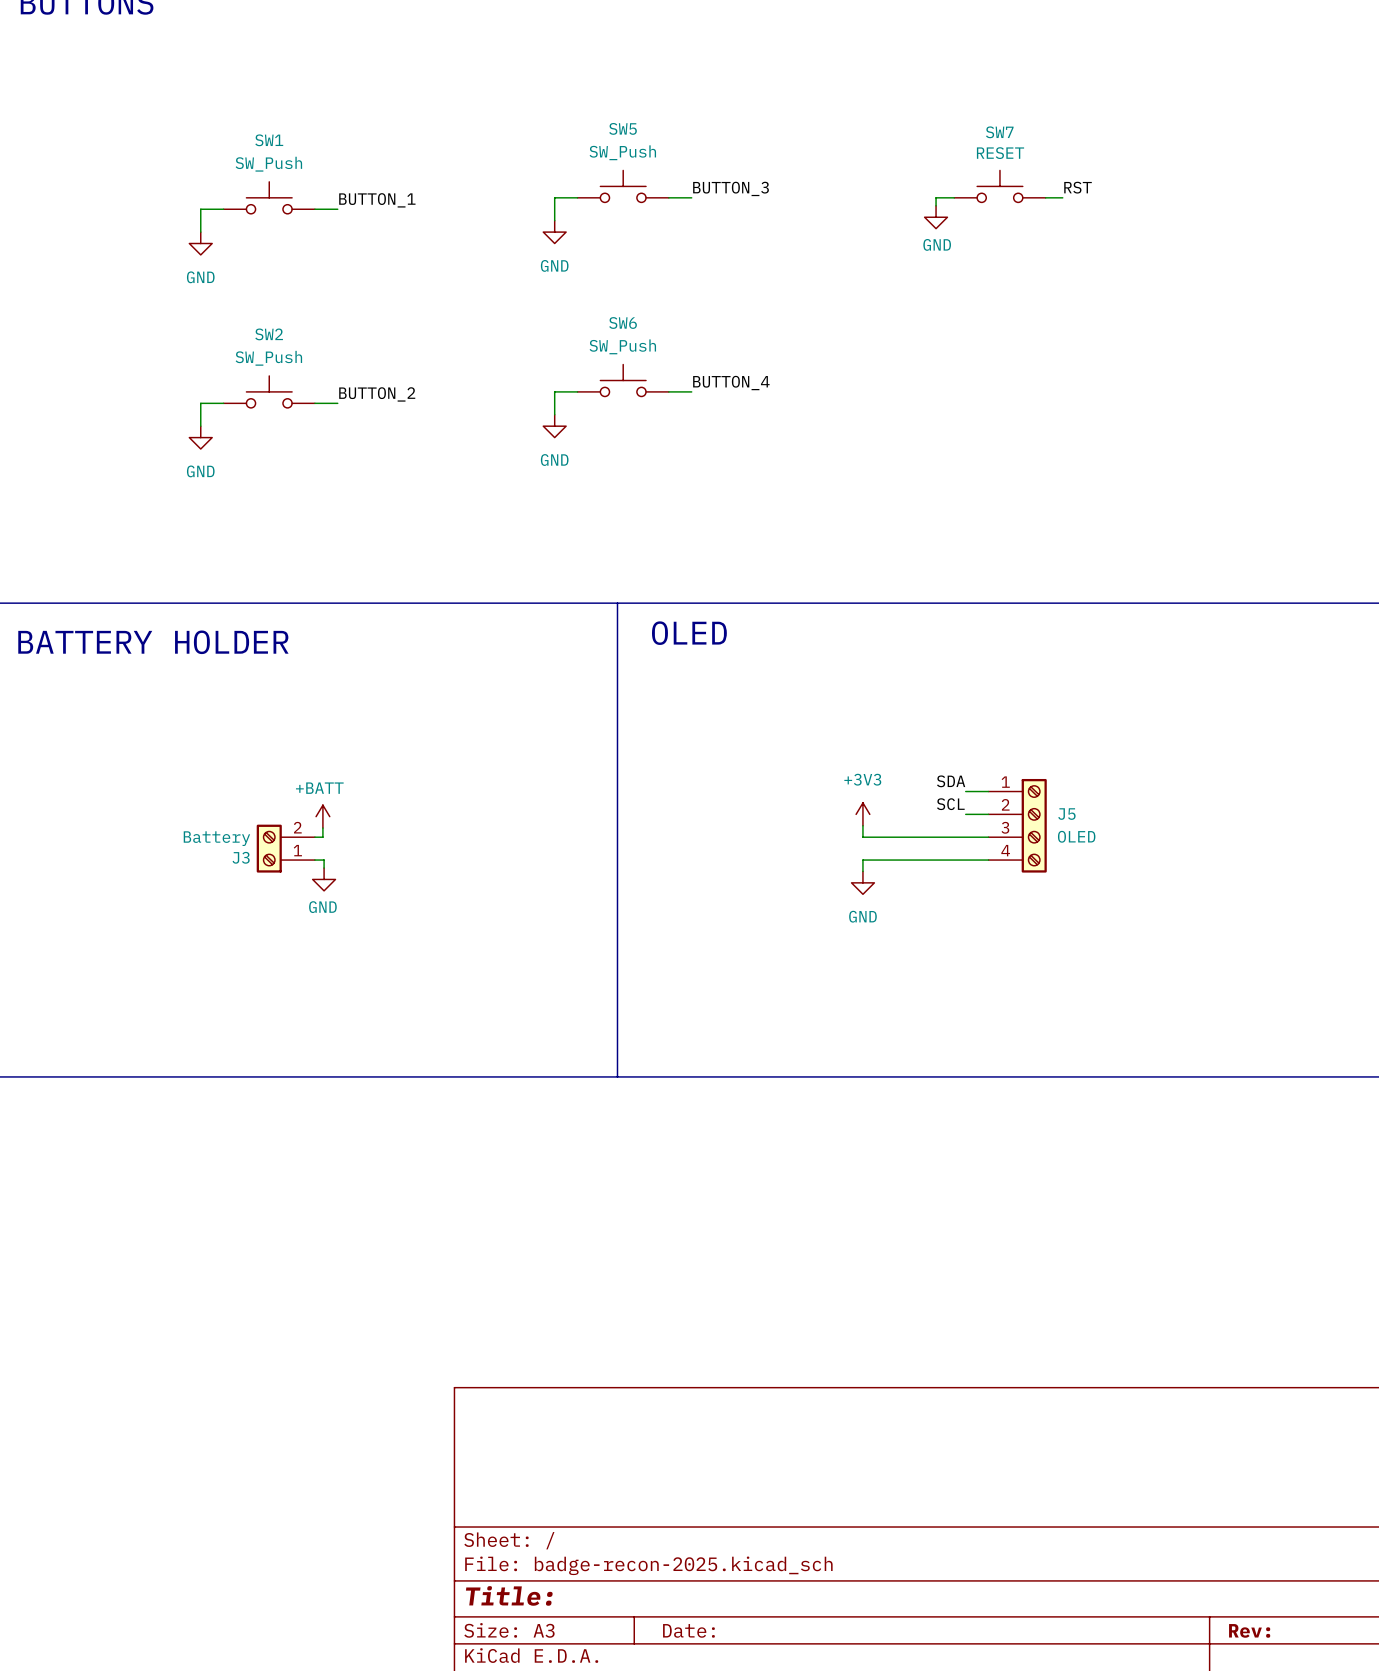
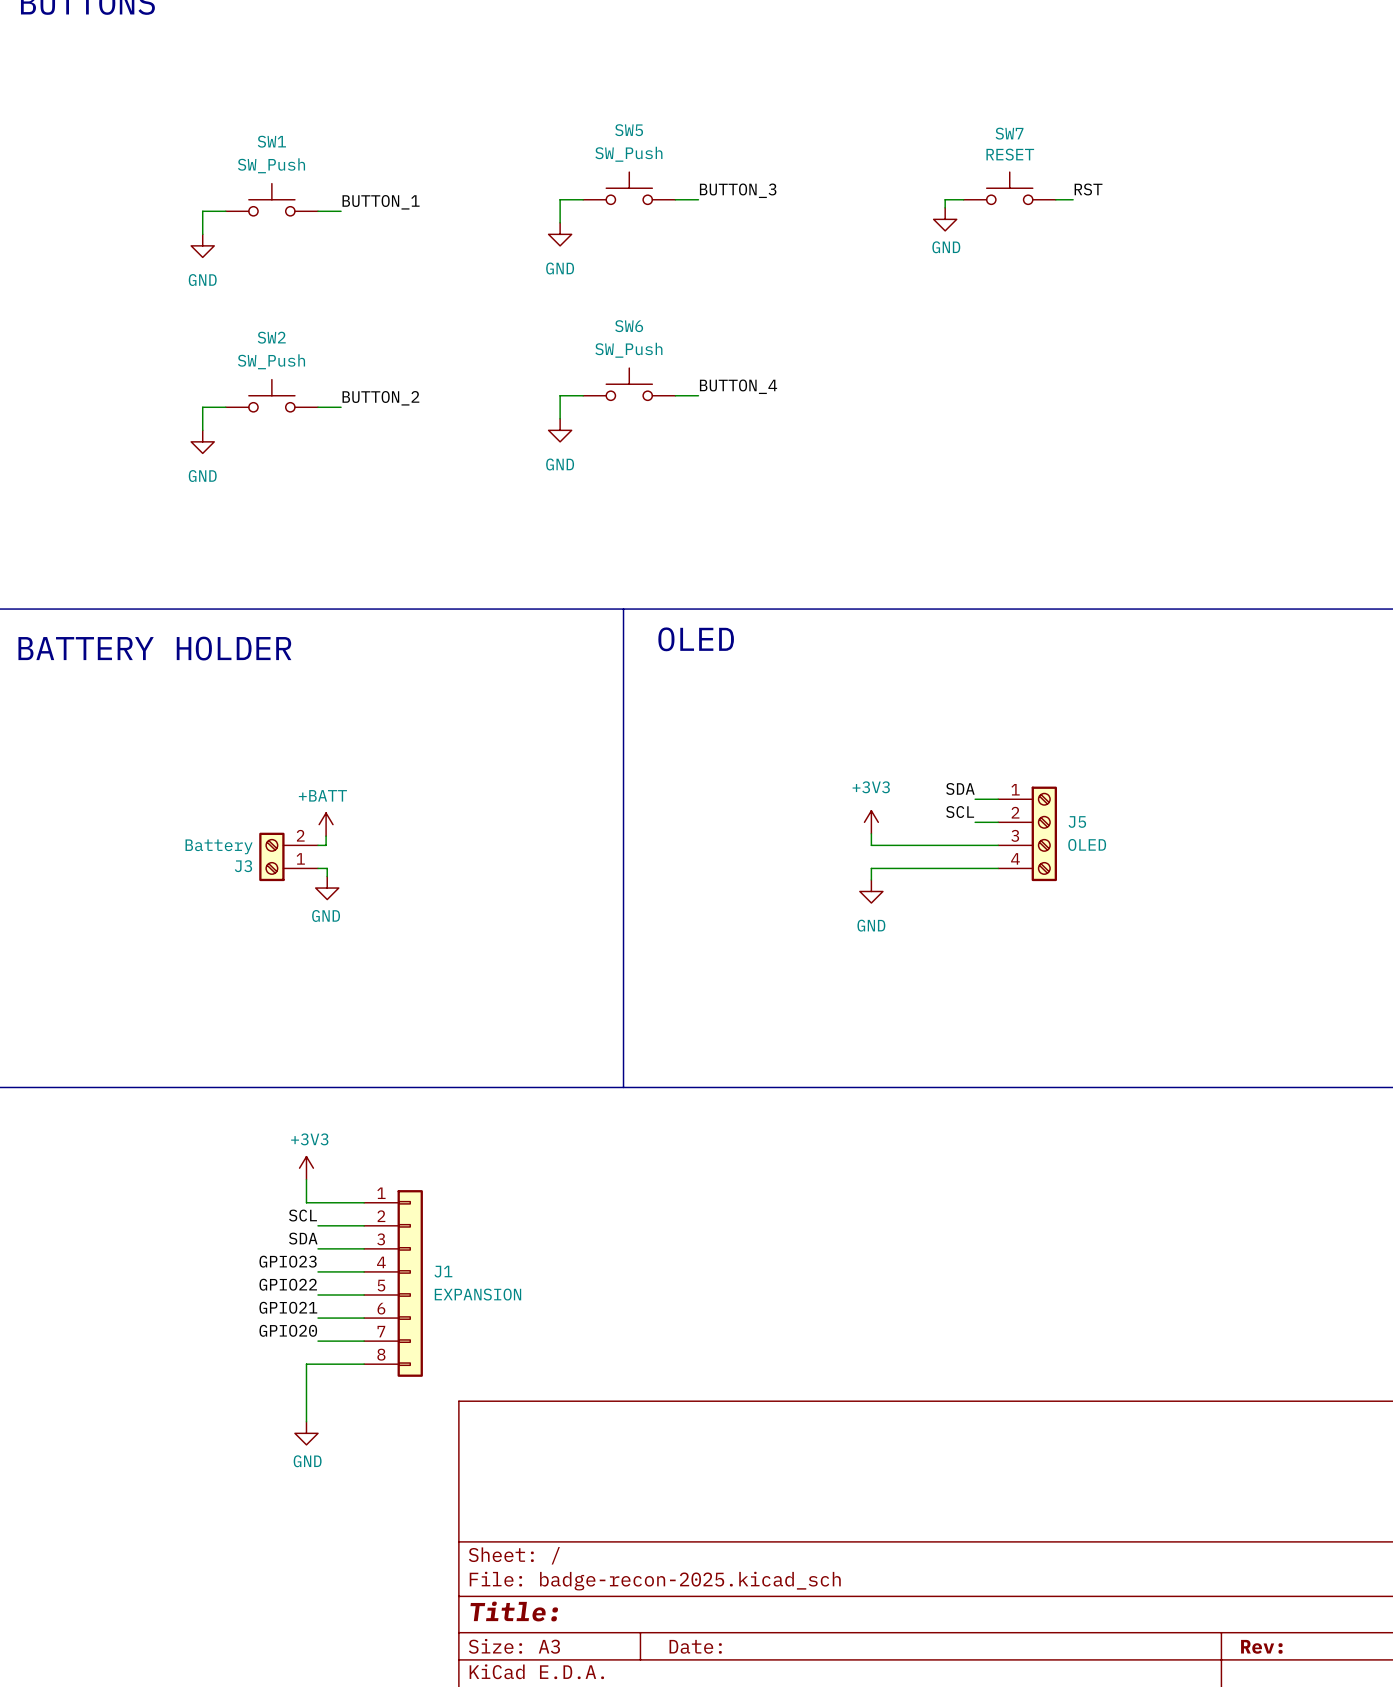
power symbol: none -> +3V3 (306, 1168)
wire: none -> (306, 1179) (306, 1202) (364, 1202)
label: none -> SCL (302, 1215)
wire: none -> (318, 1225) (364, 1225)
label: none -> SDA (303, 1238)
wire: none -> (318, 1248) (364, 1248)
label: none -> GPIO23 (288, 1261)
wire: none -> (318, 1271) (364, 1271)
J1: none -> EXPANSION (393, 1283)
label: none -> GPIO22 (288, 1284)
wire: none -> (318, 1295) (364, 1295)
label: none -> GPIO21 (288, 1307)
wire: none -> (318, 1318) (364, 1318)
label: none -> GPIO20 (288, 1330)
wire: none -> (318, 1341) (364, 1341)
wire: none -> (364, 1364) (306, 1364) (306, 1421)
power symbol: none -> GND (306, 1433)

